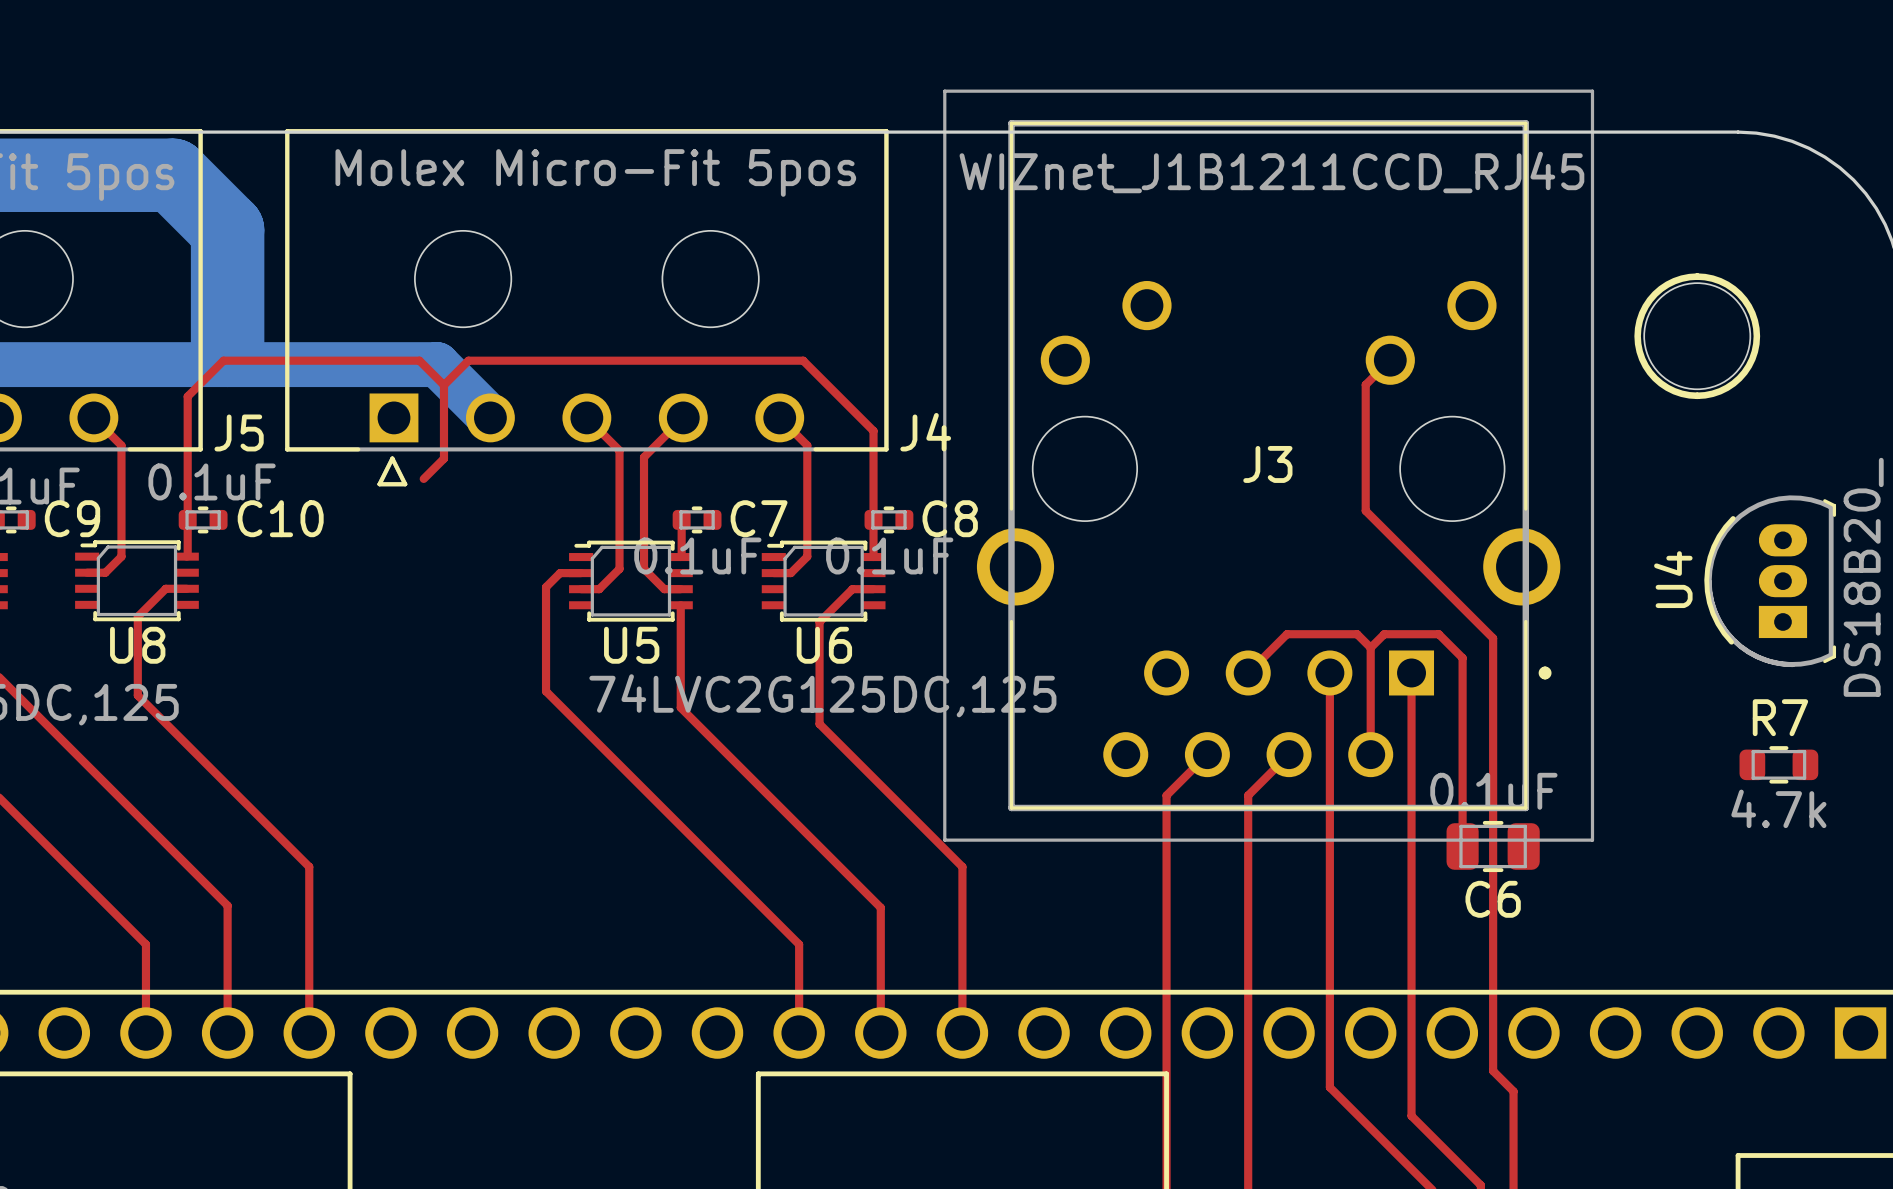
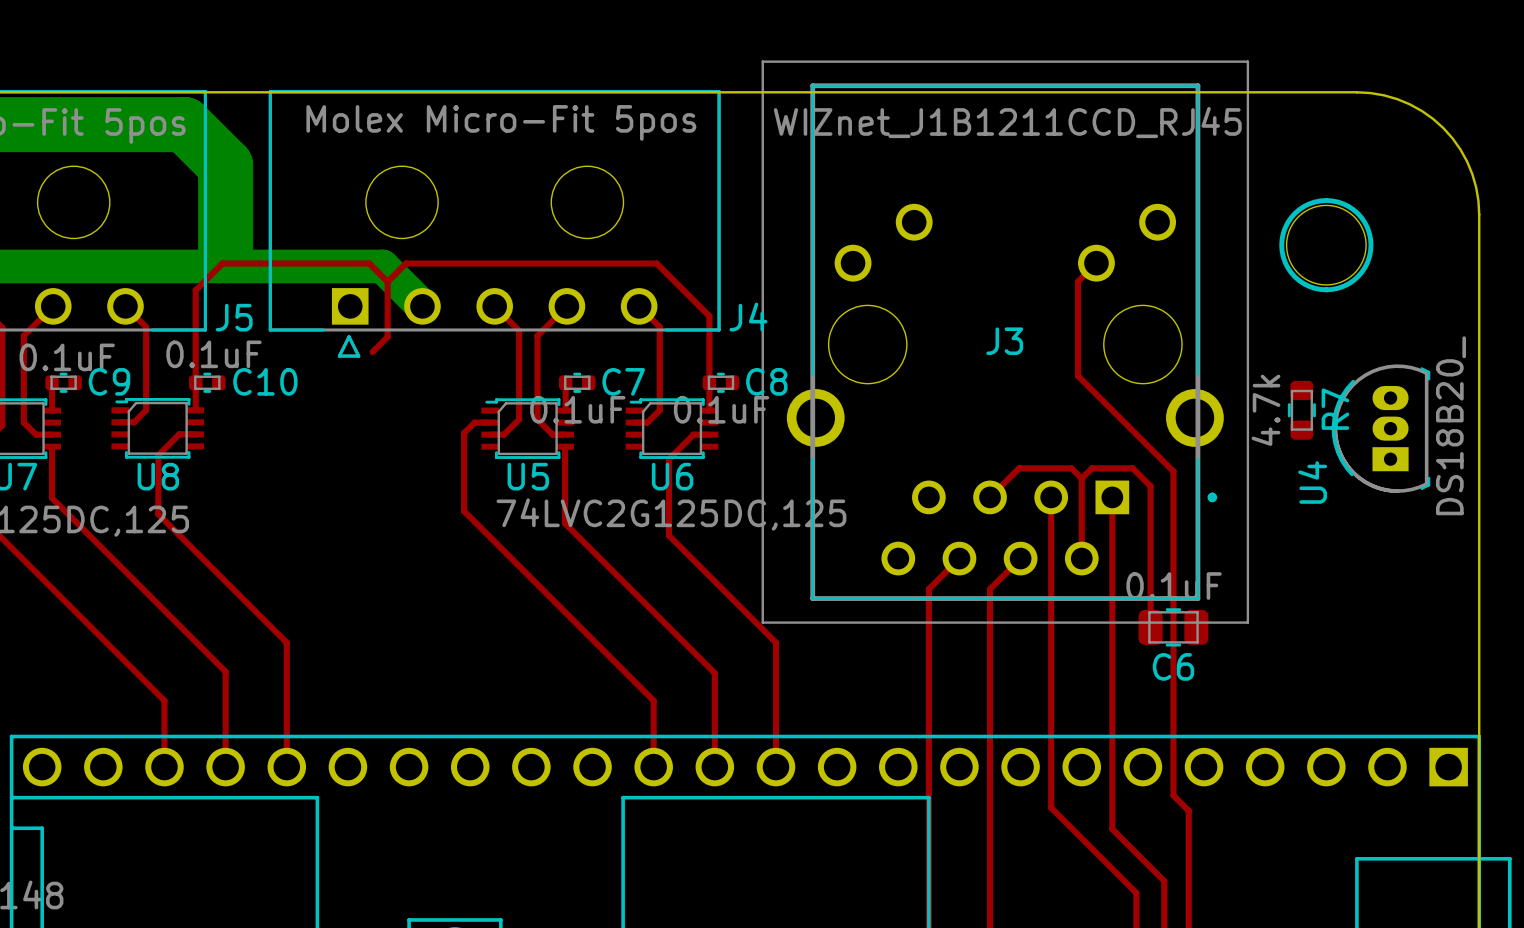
U4 name position: U4 (1673, 579) -> U4 (1312, 482)
R7 rotation: 0° (1778, 764) -> 90° clockwise (1301, 410)
R7 position: (1778, 764) -> (1301, 410)

